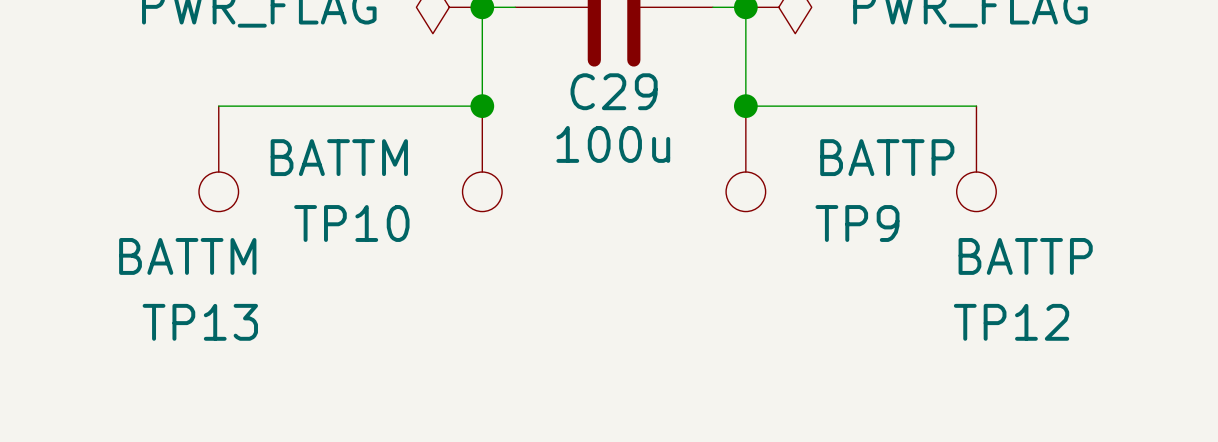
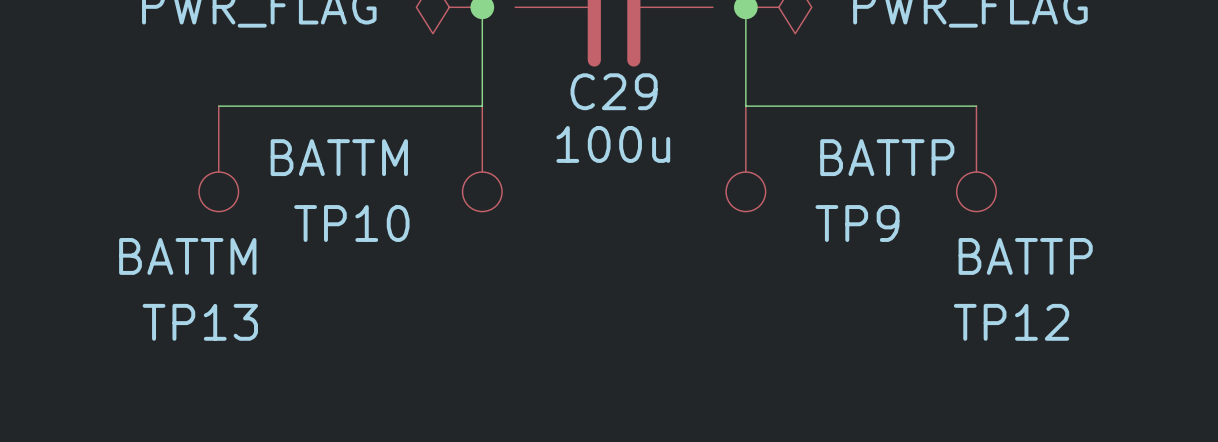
wire: (482, 7) (515, 7) -> none
wire: (712, 7) (745, 7) -> none
junction: (482, 106) -> none
junction: (745, 106) -> none

